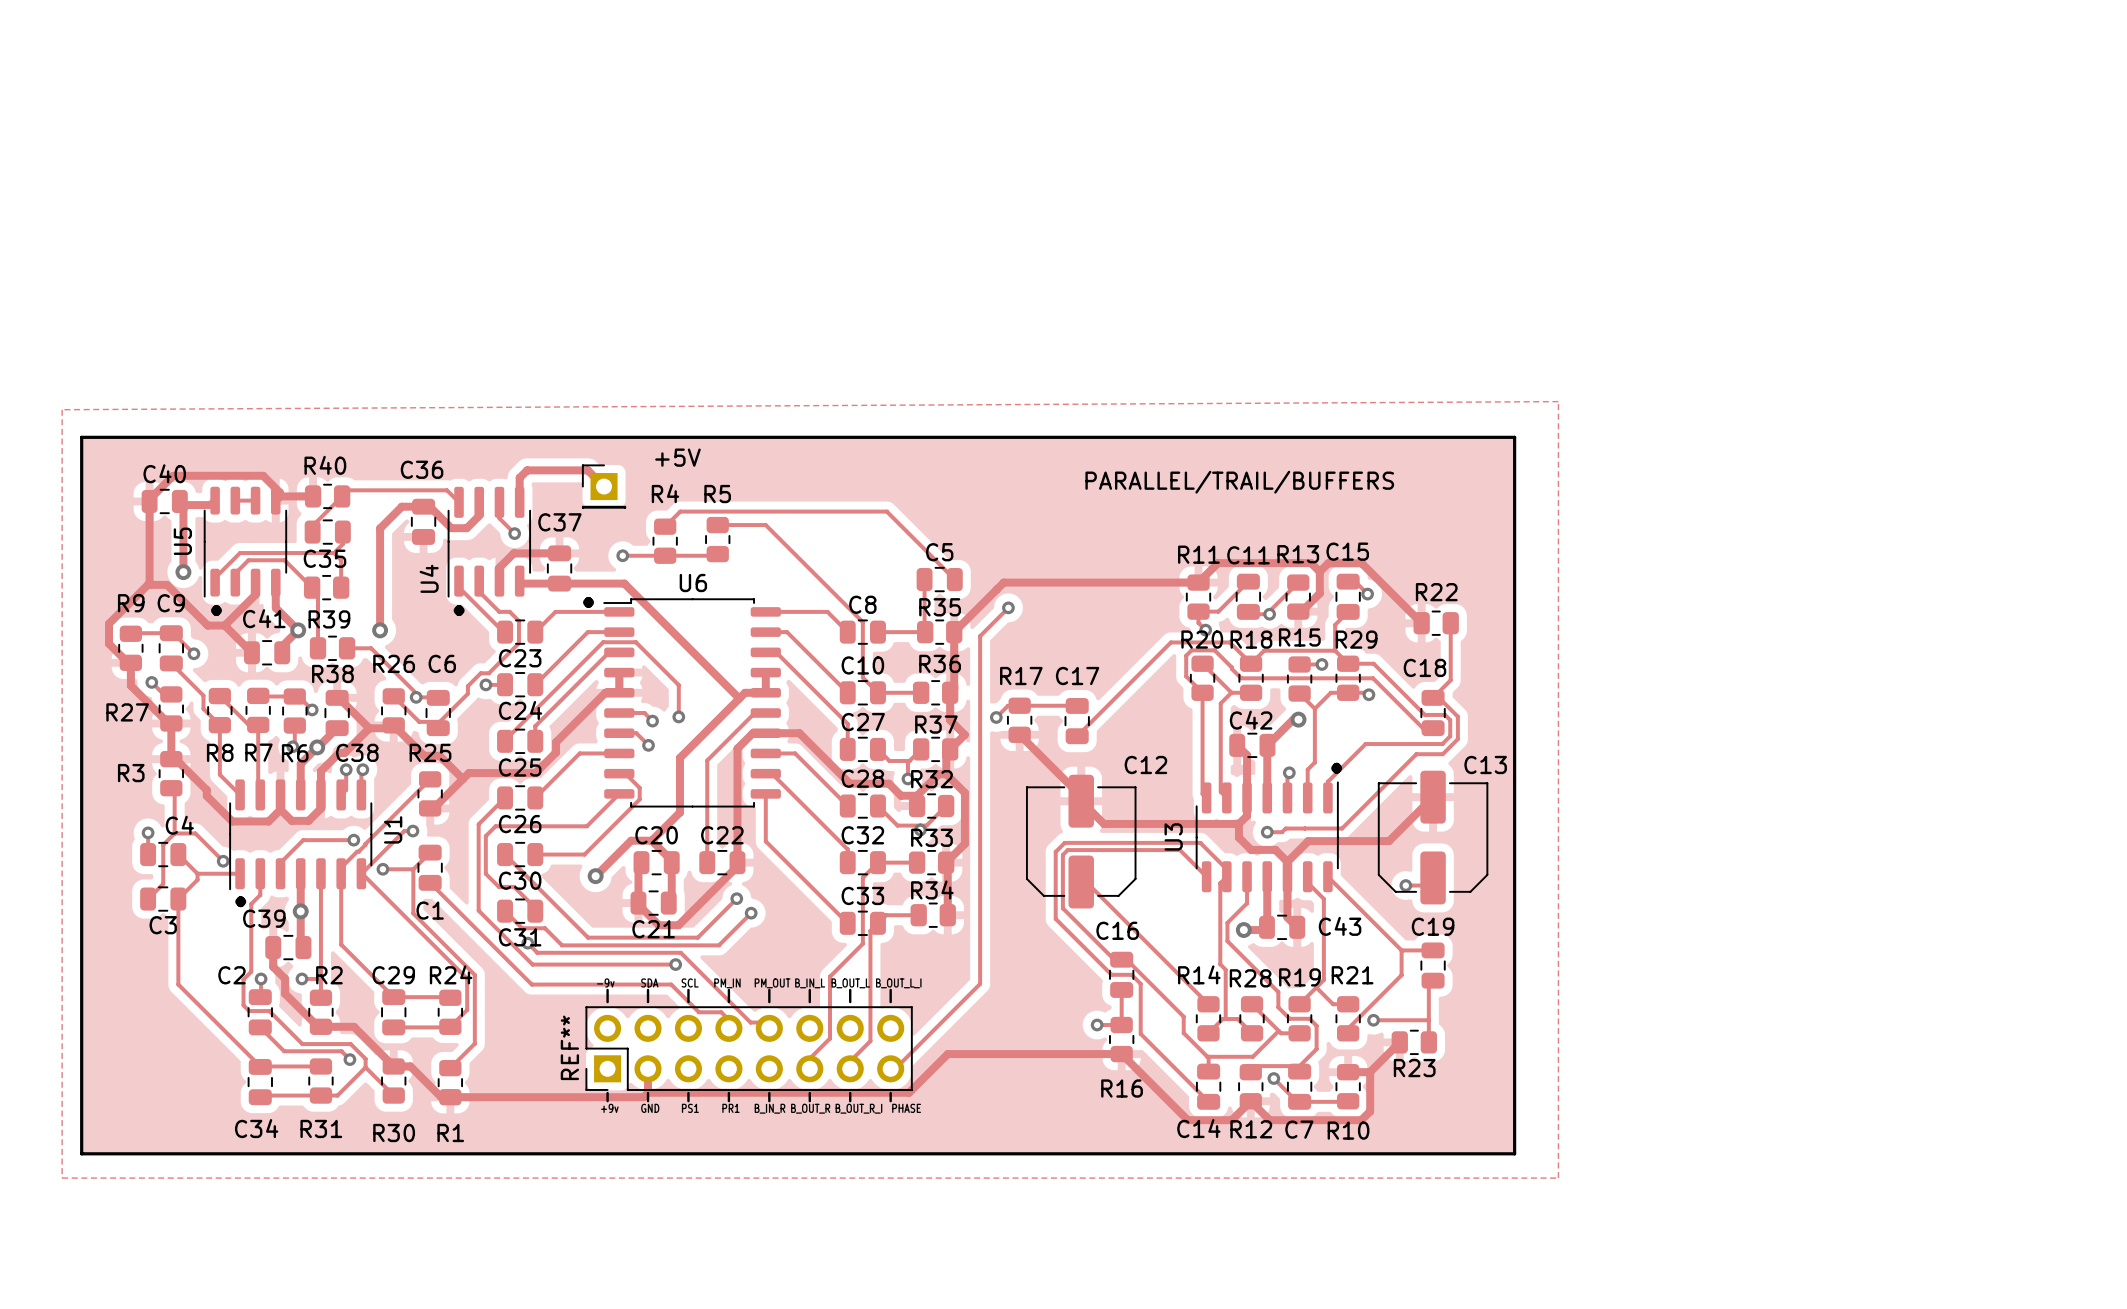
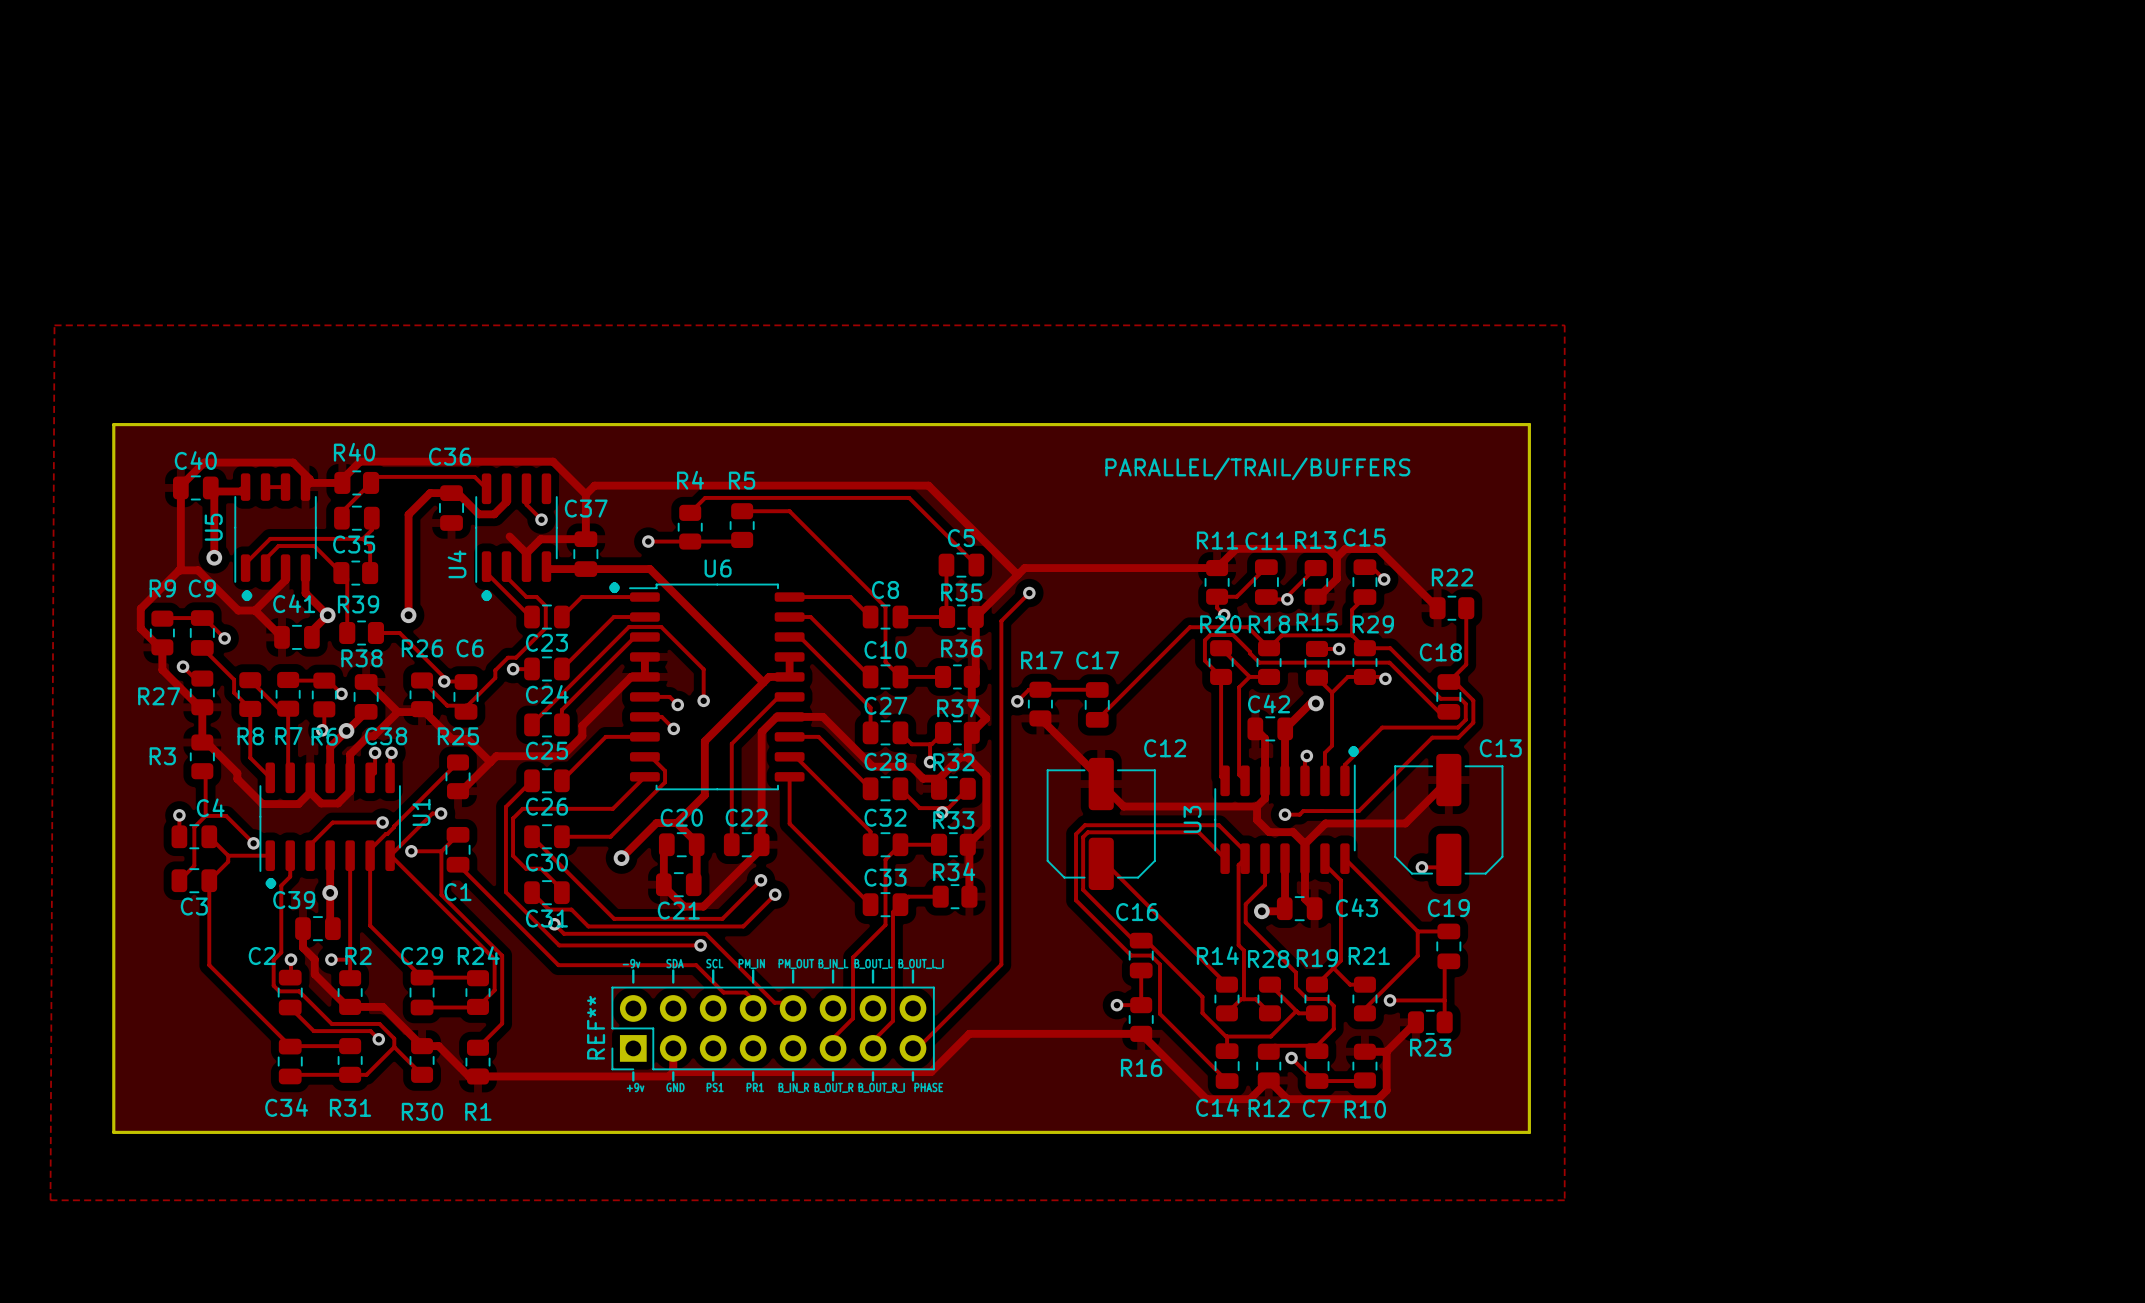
zone outline: (1558, 401) (1558, 1178) (62, 1178) (62, 409) (1558, 401) -> (54, 325) (50, 1200) (1564, 1200) (1564, 325) (54, 325)
track: (604, 486) (587, 470) (527, 470) (519, 477) (519, 502) -> none
+5V: (604, 486) -> none
track: none -> (342, 482) (342, 479) (360, 461) (553, 461) (585, 494)
track: none -> (585, 494) (594, 485) (928, 485) (1017, 574)
track: none -> (585, 494) (585, 539)
track: none -> (509, 536) (526, 553)

